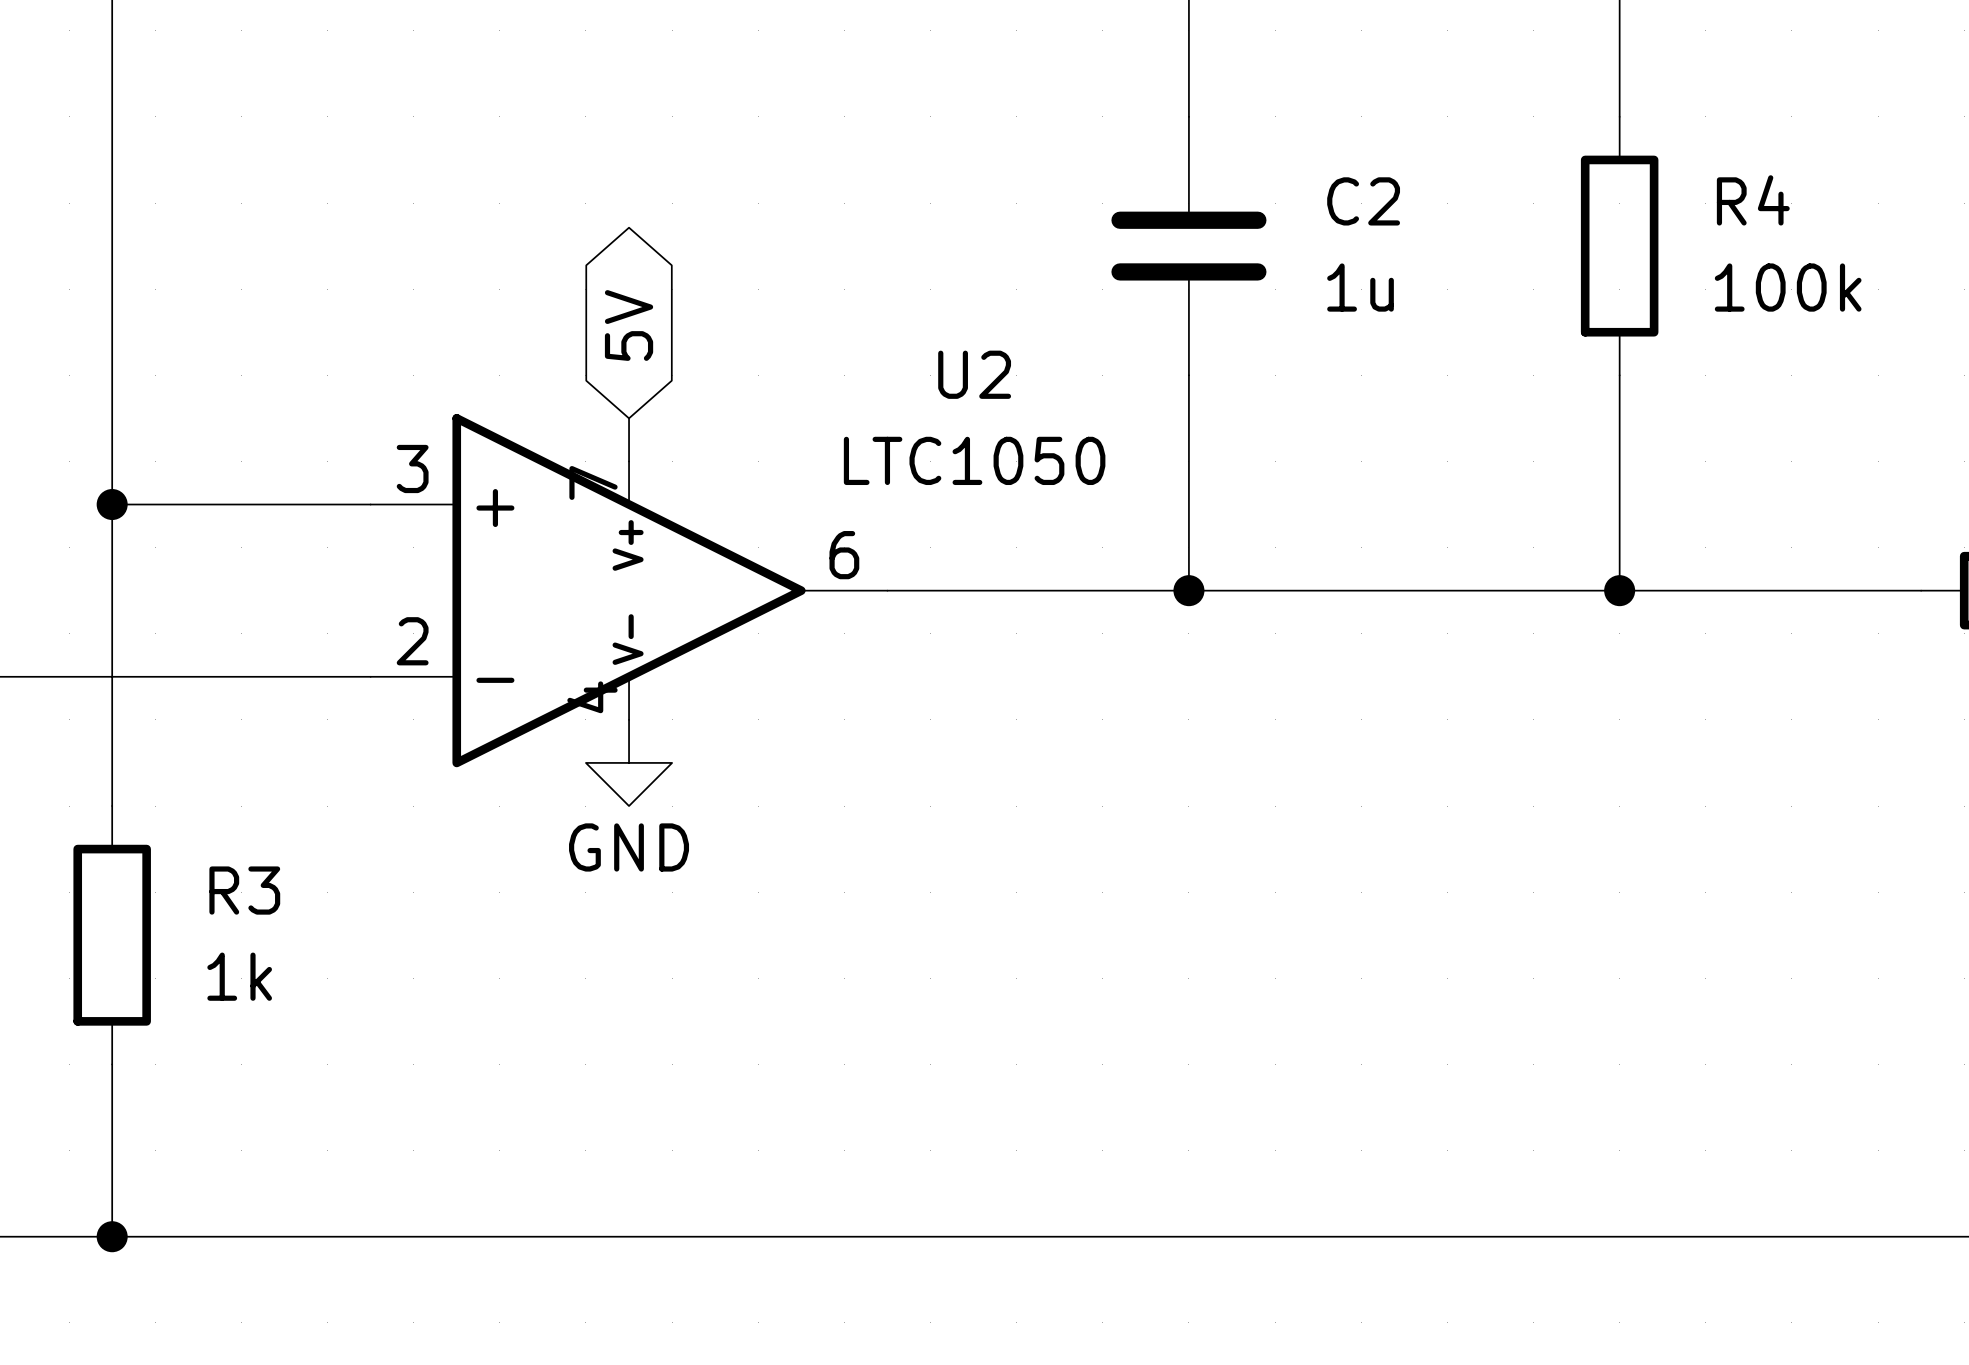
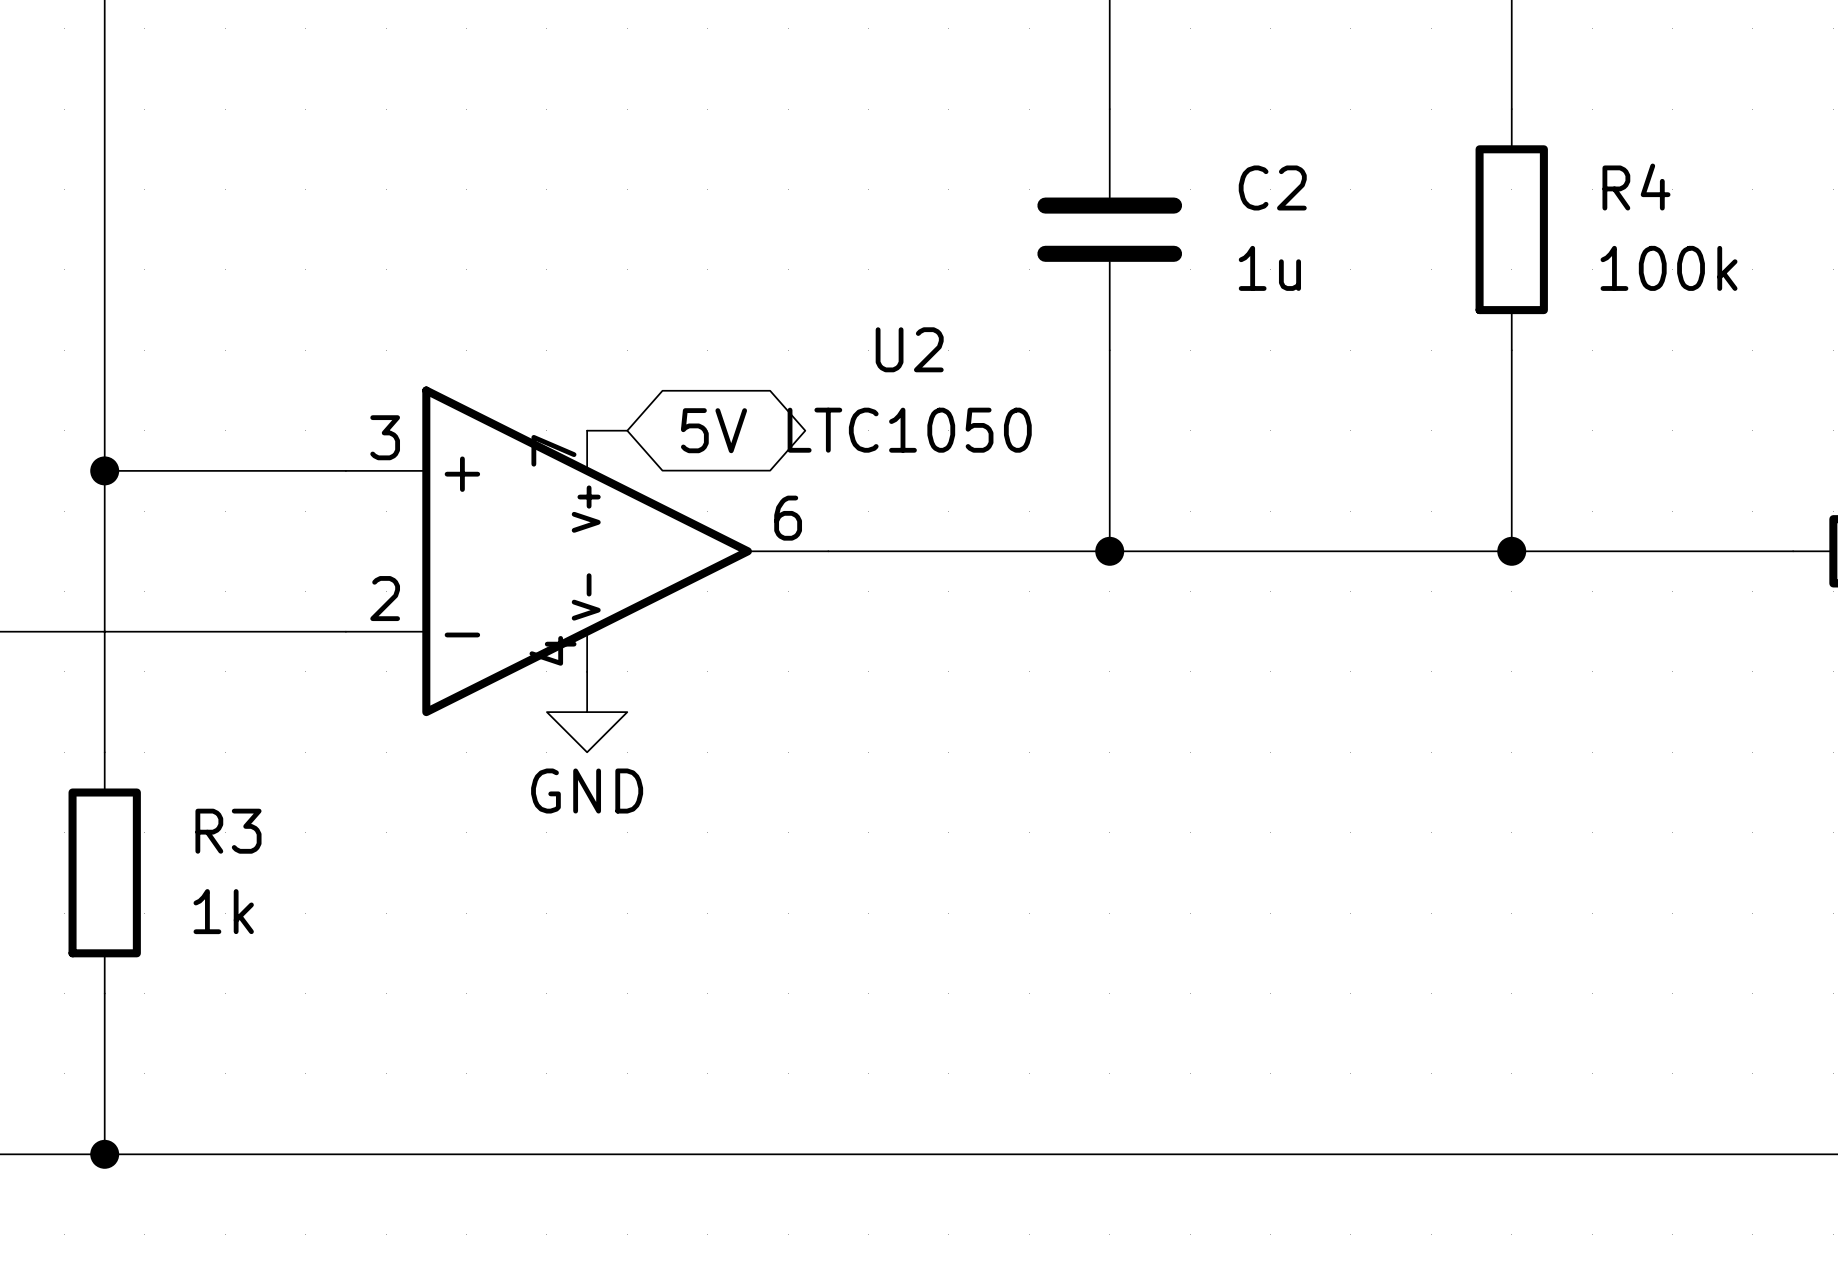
global label rotation: 0° (629, 325) -> 90° clockwise (714, 430)
global label position: 5V (629, 325) -> 5V (714, 430)
wire: (629, 418) (629, 461) -> (627, 430) (587, 430)

